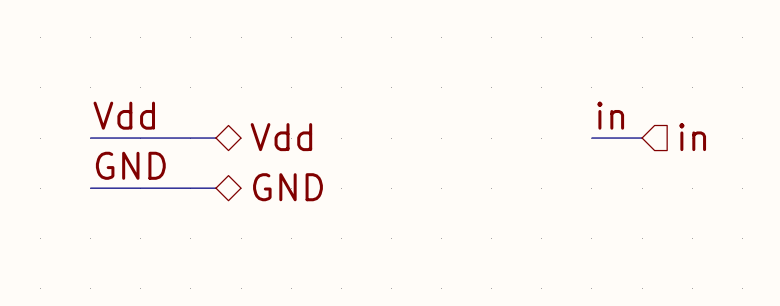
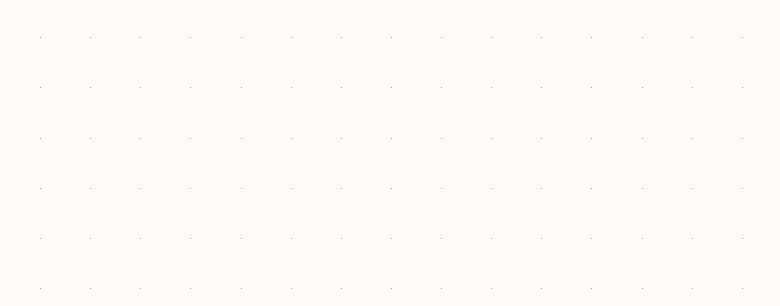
label: Vdd (124, 115) -> none
label: in (610, 115) -> none
hierarchical label: Vdd (281, 137) -> none
hierarchical label: in (692, 137) -> none
wire: (90, 138) (215, 138) -> none
wire: (591, 138) (642, 138) -> none
label: GND (130, 165) -> none
hierarchical label: GND (287, 187) -> none
wire: (90, 188) (215, 188) -> none

